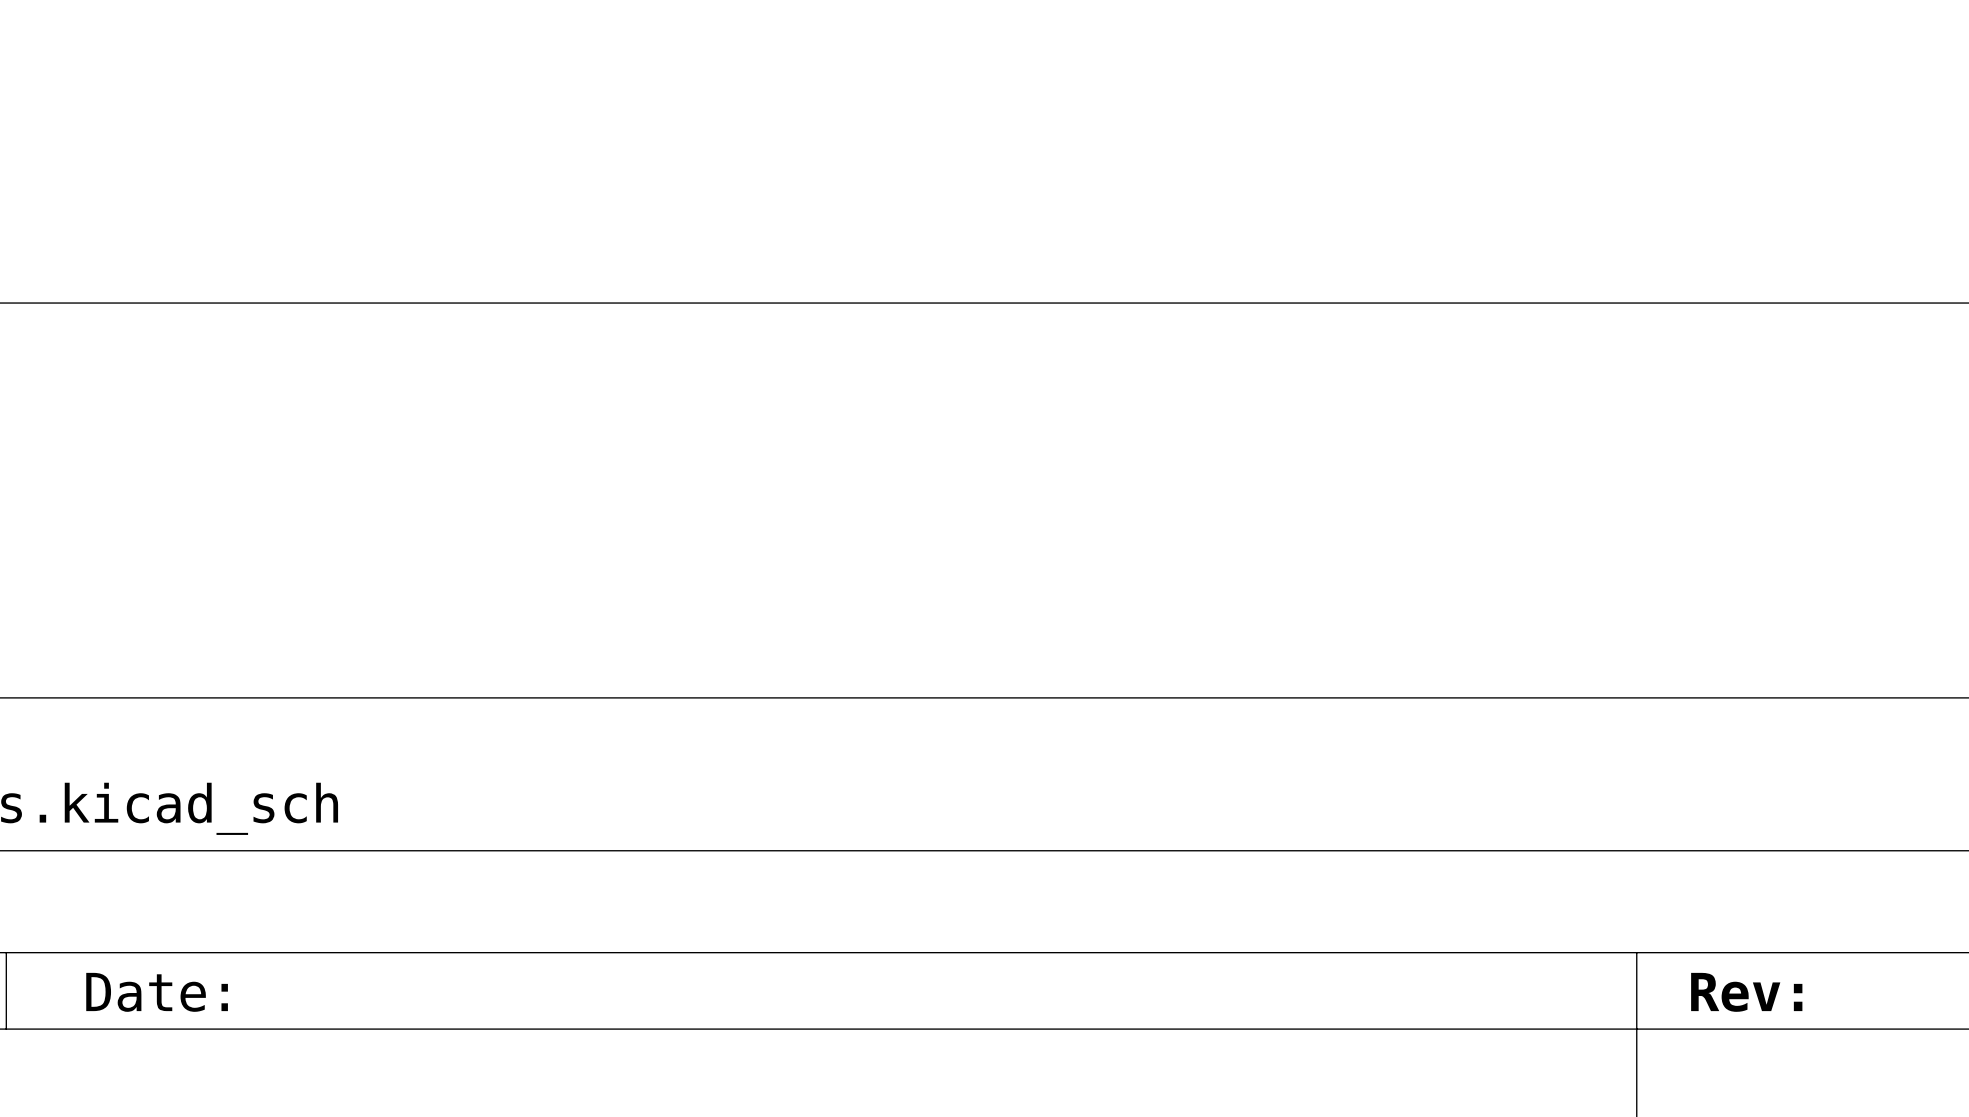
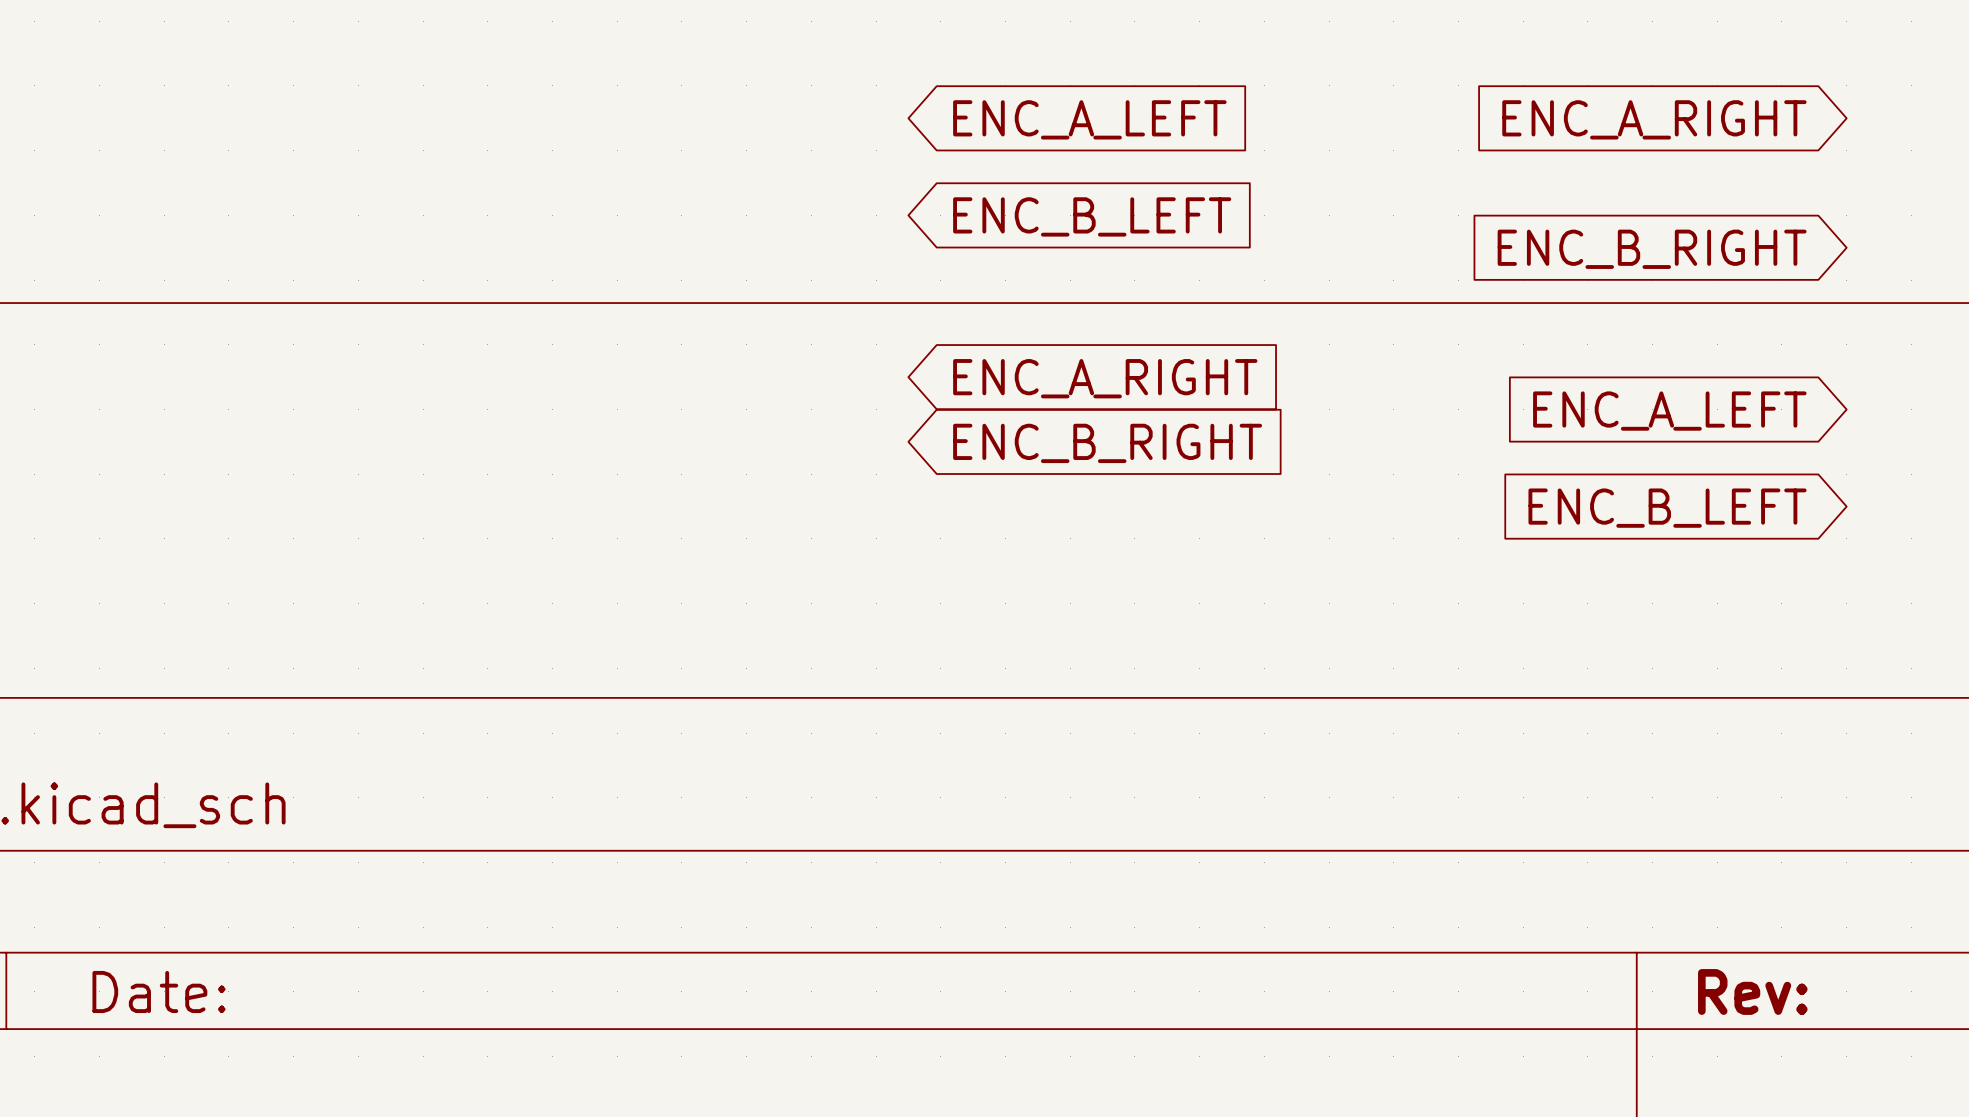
global label: none -> ENC_A_LEFT (1089, 119)
global label: none -> ENC_A_RIGHT (1654, 119)
global label: none -> ENC_B_LEFT (1092, 216)
global label: none -> ENC_B_RIGHT (1652, 249)
global label: none -> ENC_A_RIGHT (1105, 378)
global label: none -> ENC_A_LEFT (1669, 411)
global label: none -> ENC_B_RIGHT (1107, 443)
global label: none -> ENC_B_LEFT (1667, 508)

